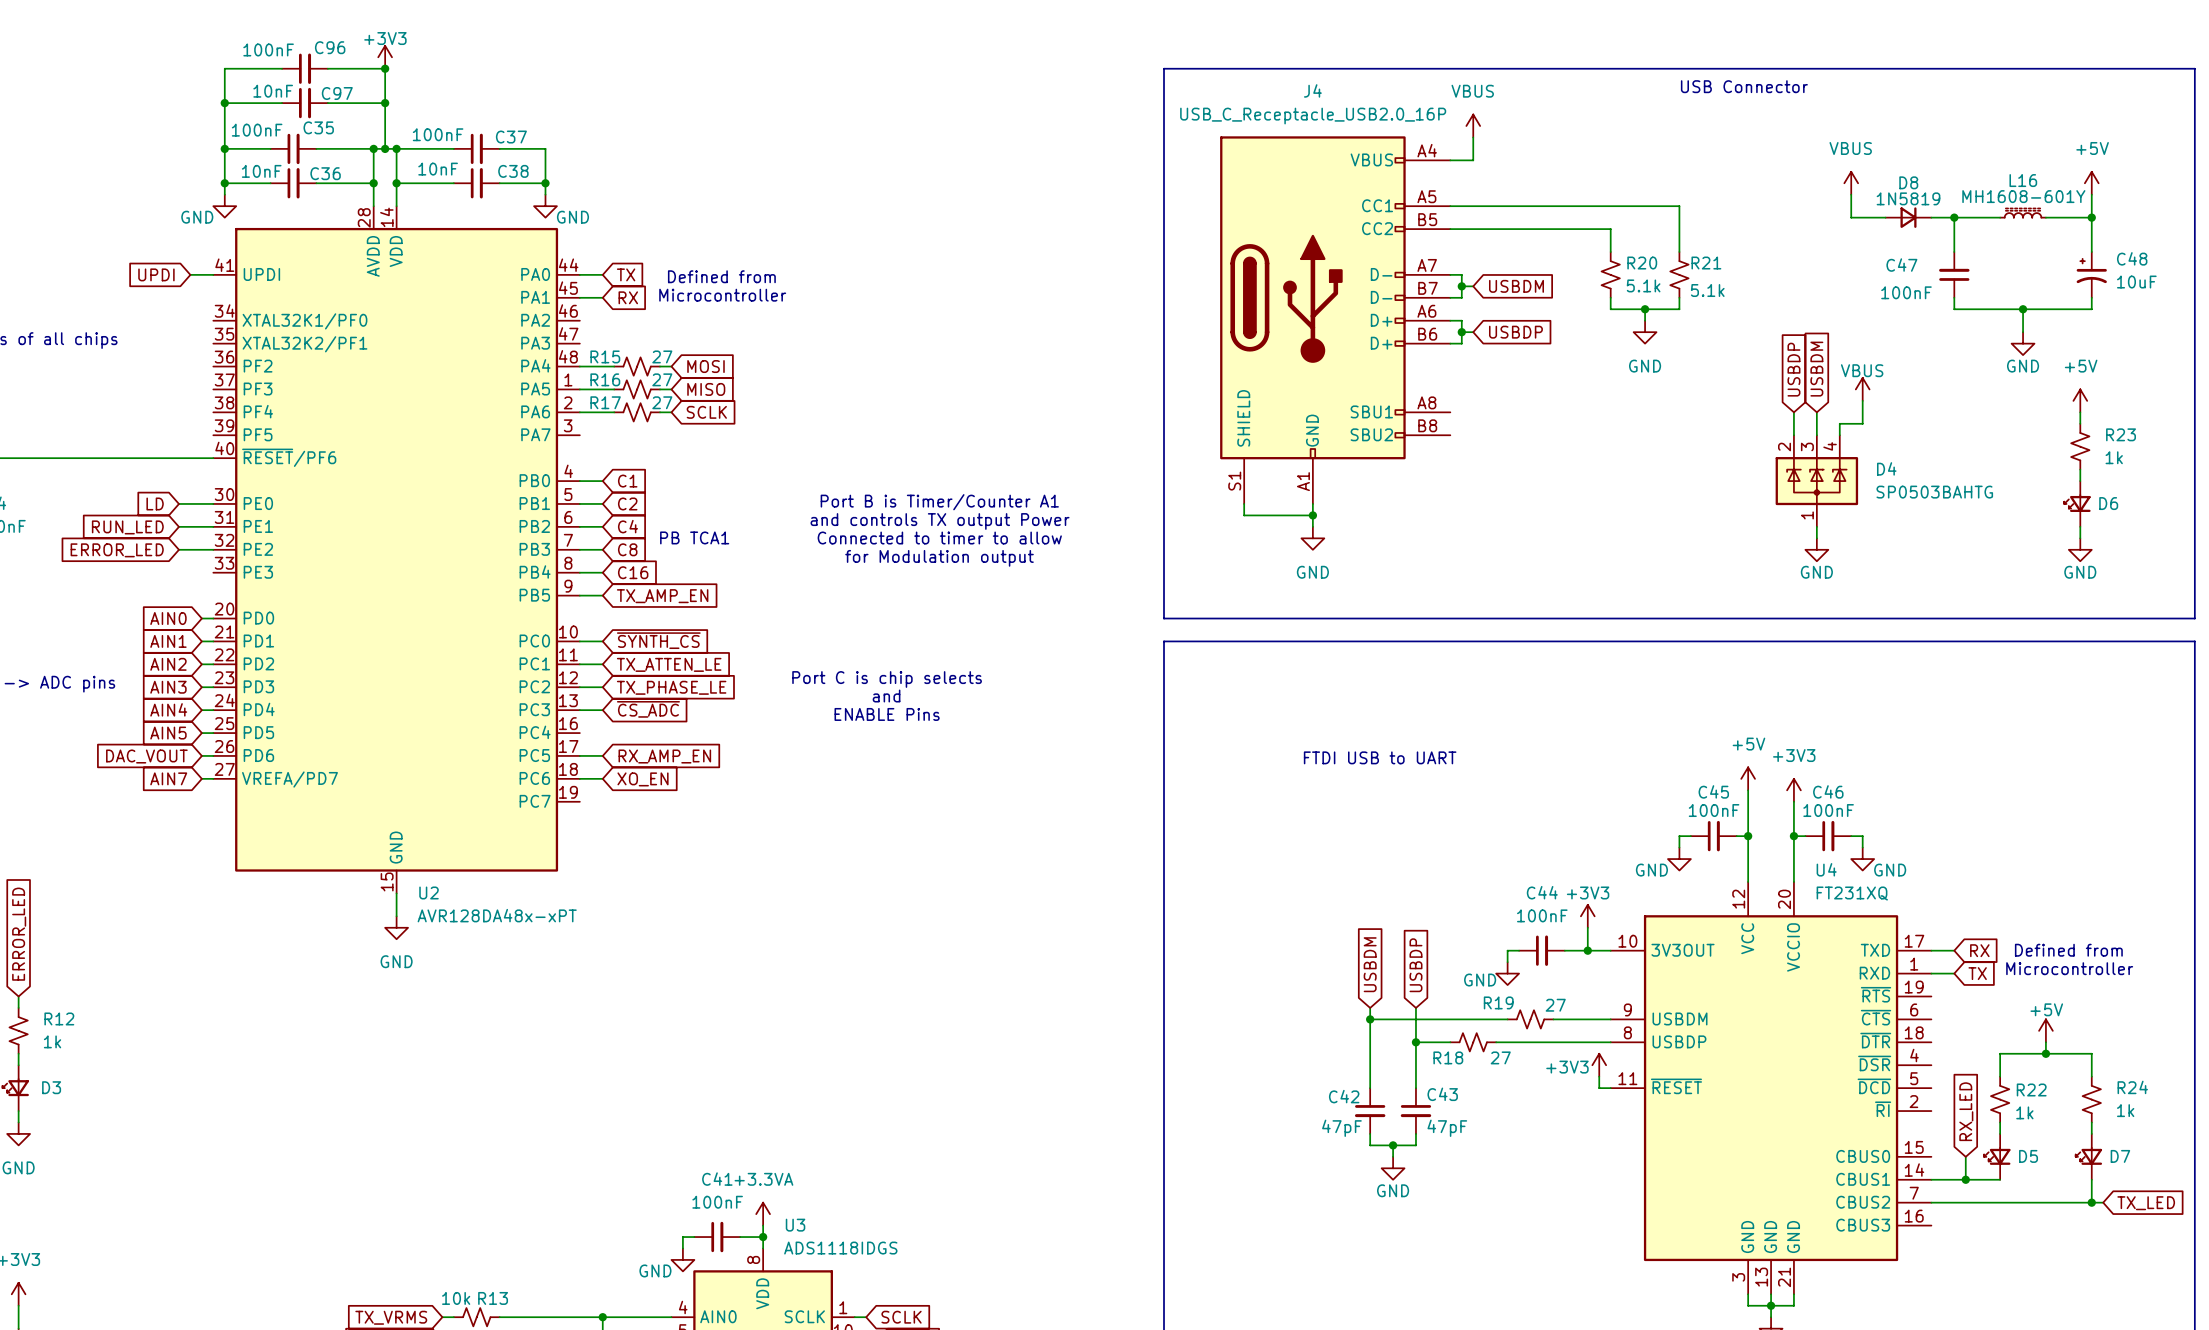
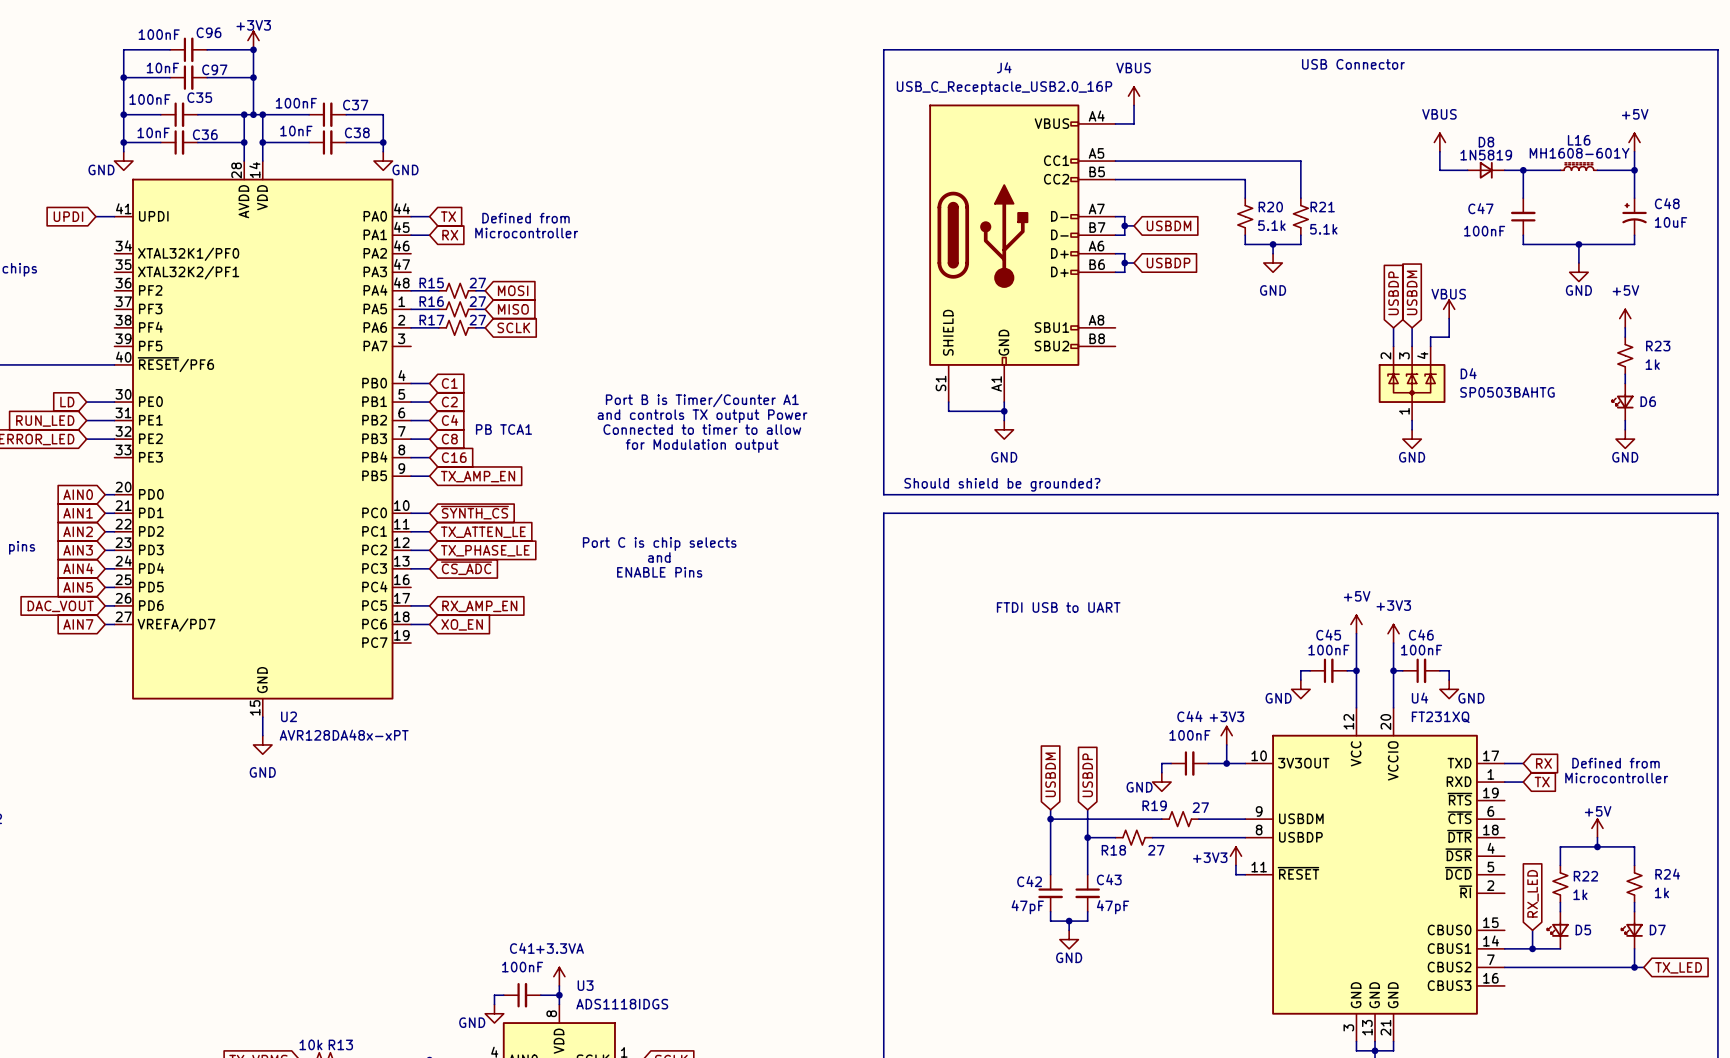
text: none -> Should shield be grounded? (1002, 484)

